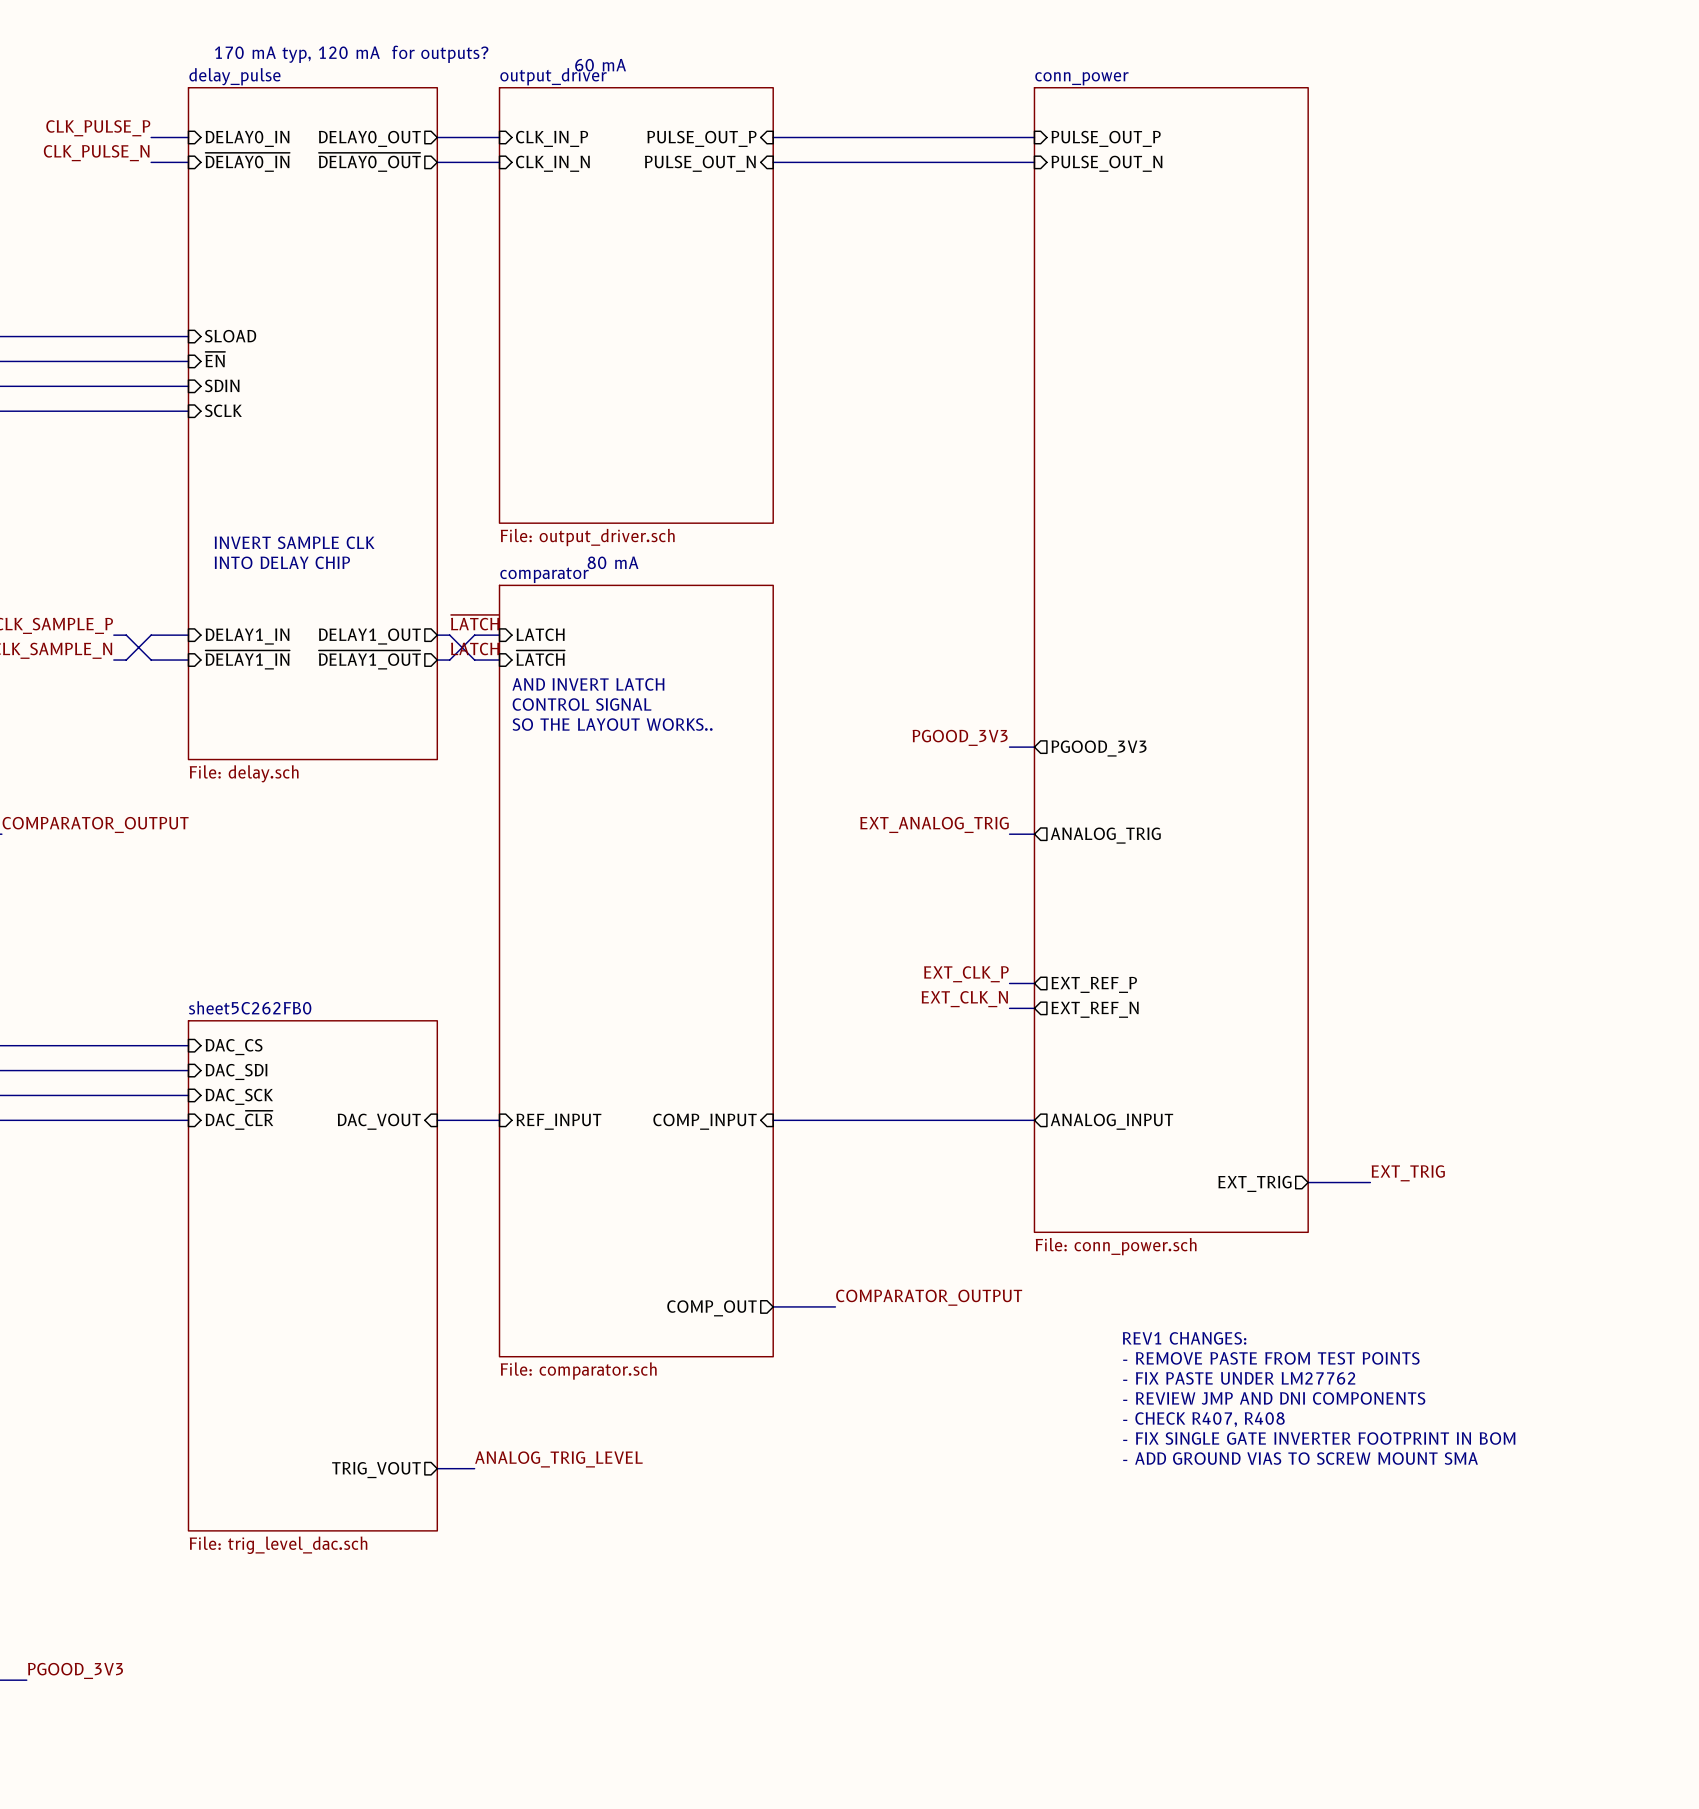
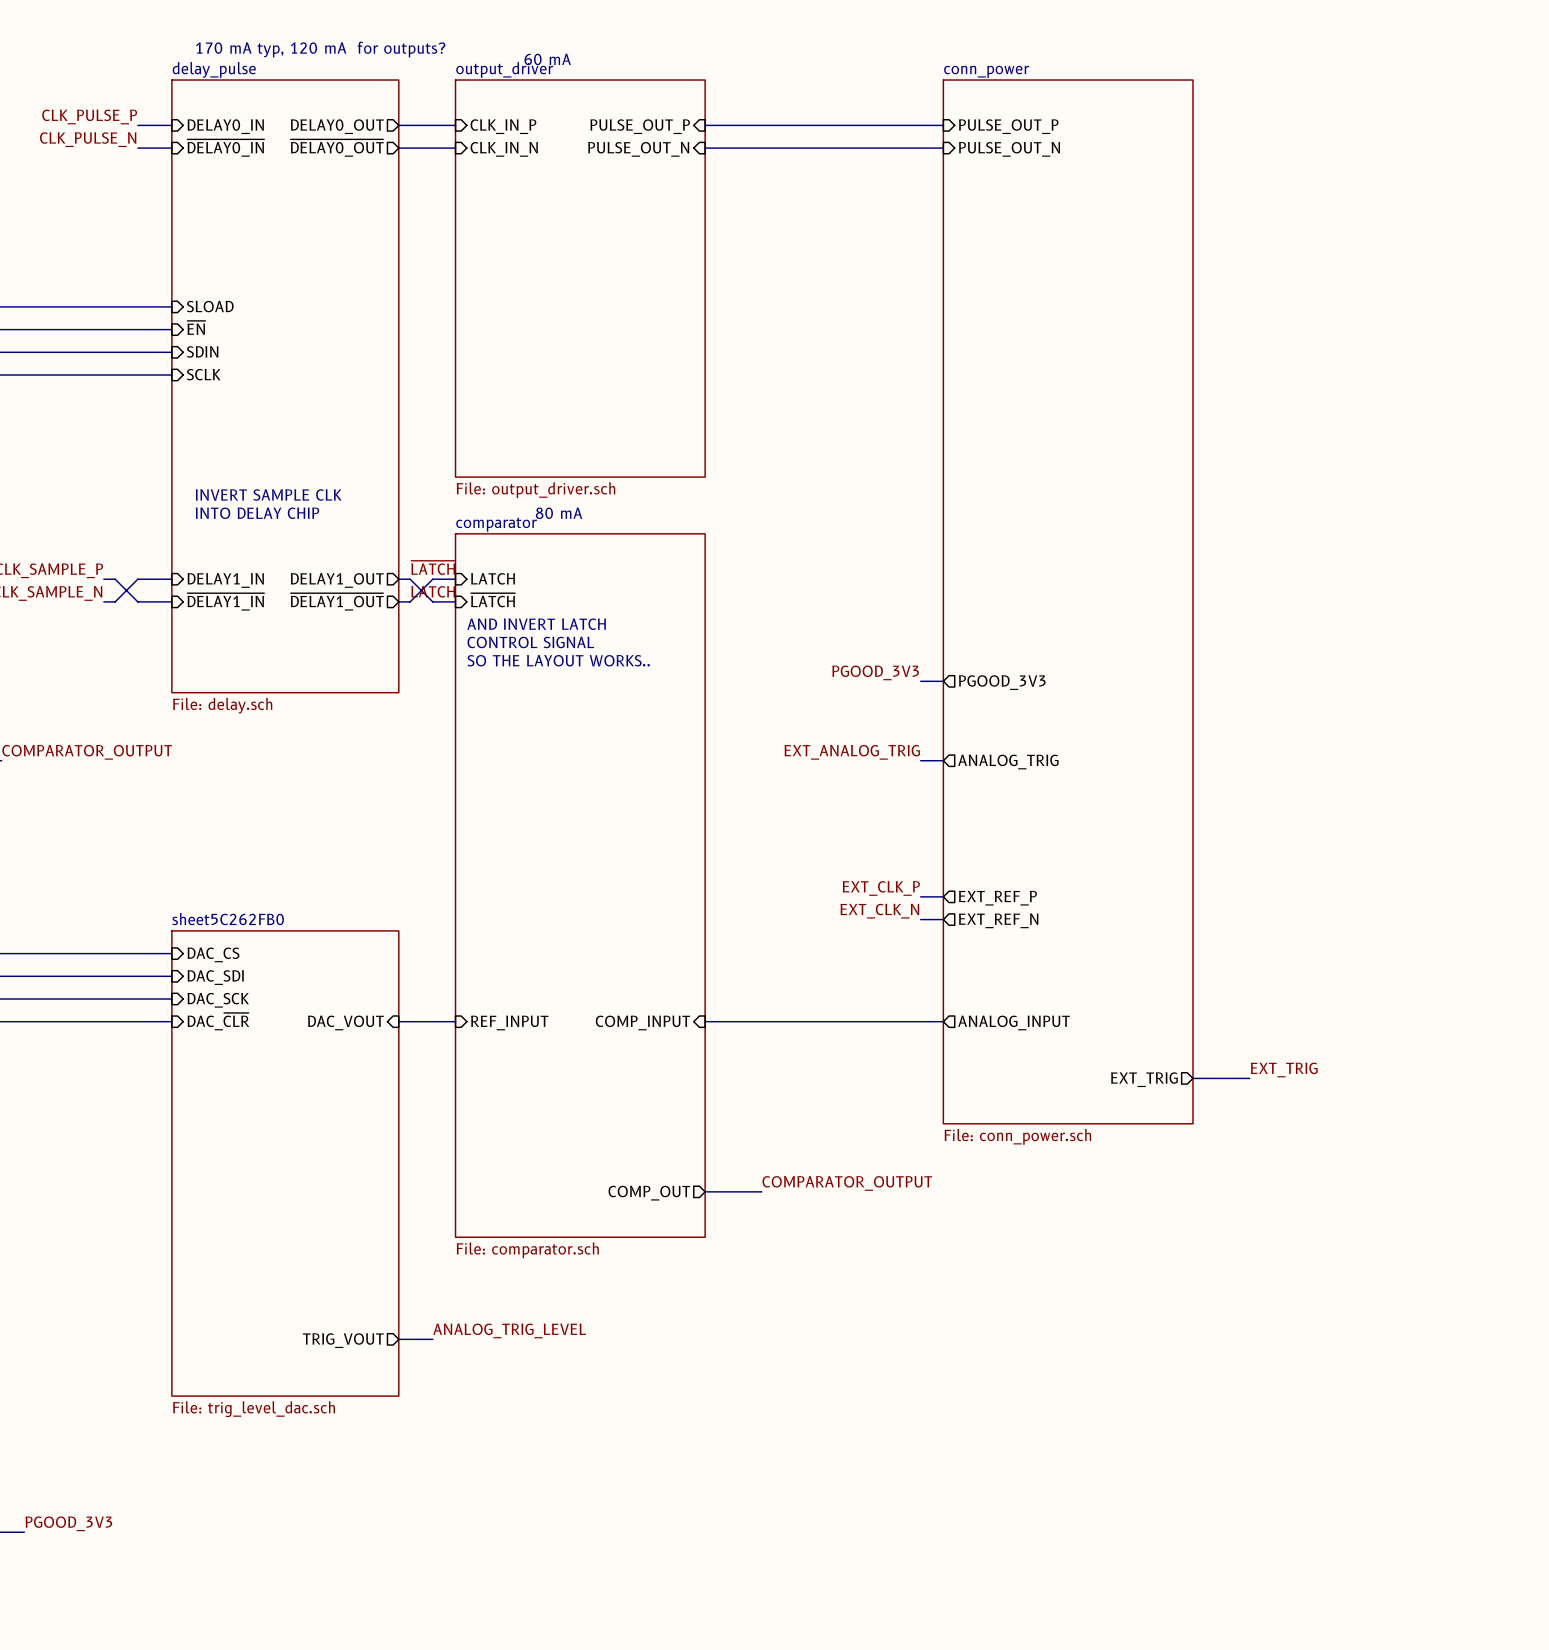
text: REV1 CHANGES: (1184, 1338) -> none
text: - REMOVE PASTE FROM TEST POINTS (1271, 1358) -> none
text: - FIX PASTE UNDER LM27762 (1239, 1378) -> none
text: - REVIEW JMP AND DNI COMPONENTS (1274, 1398) -> none
text: - CHECK R407, R408 (1203, 1419) -> none
text: - FIX SINGLE GATE INVERTER FOOTPRINT IN BOM (1319, 1438) -> none
text: - ADD GROUND VIAS TO SCREW MOUNT SMA (1300, 1458) -> none

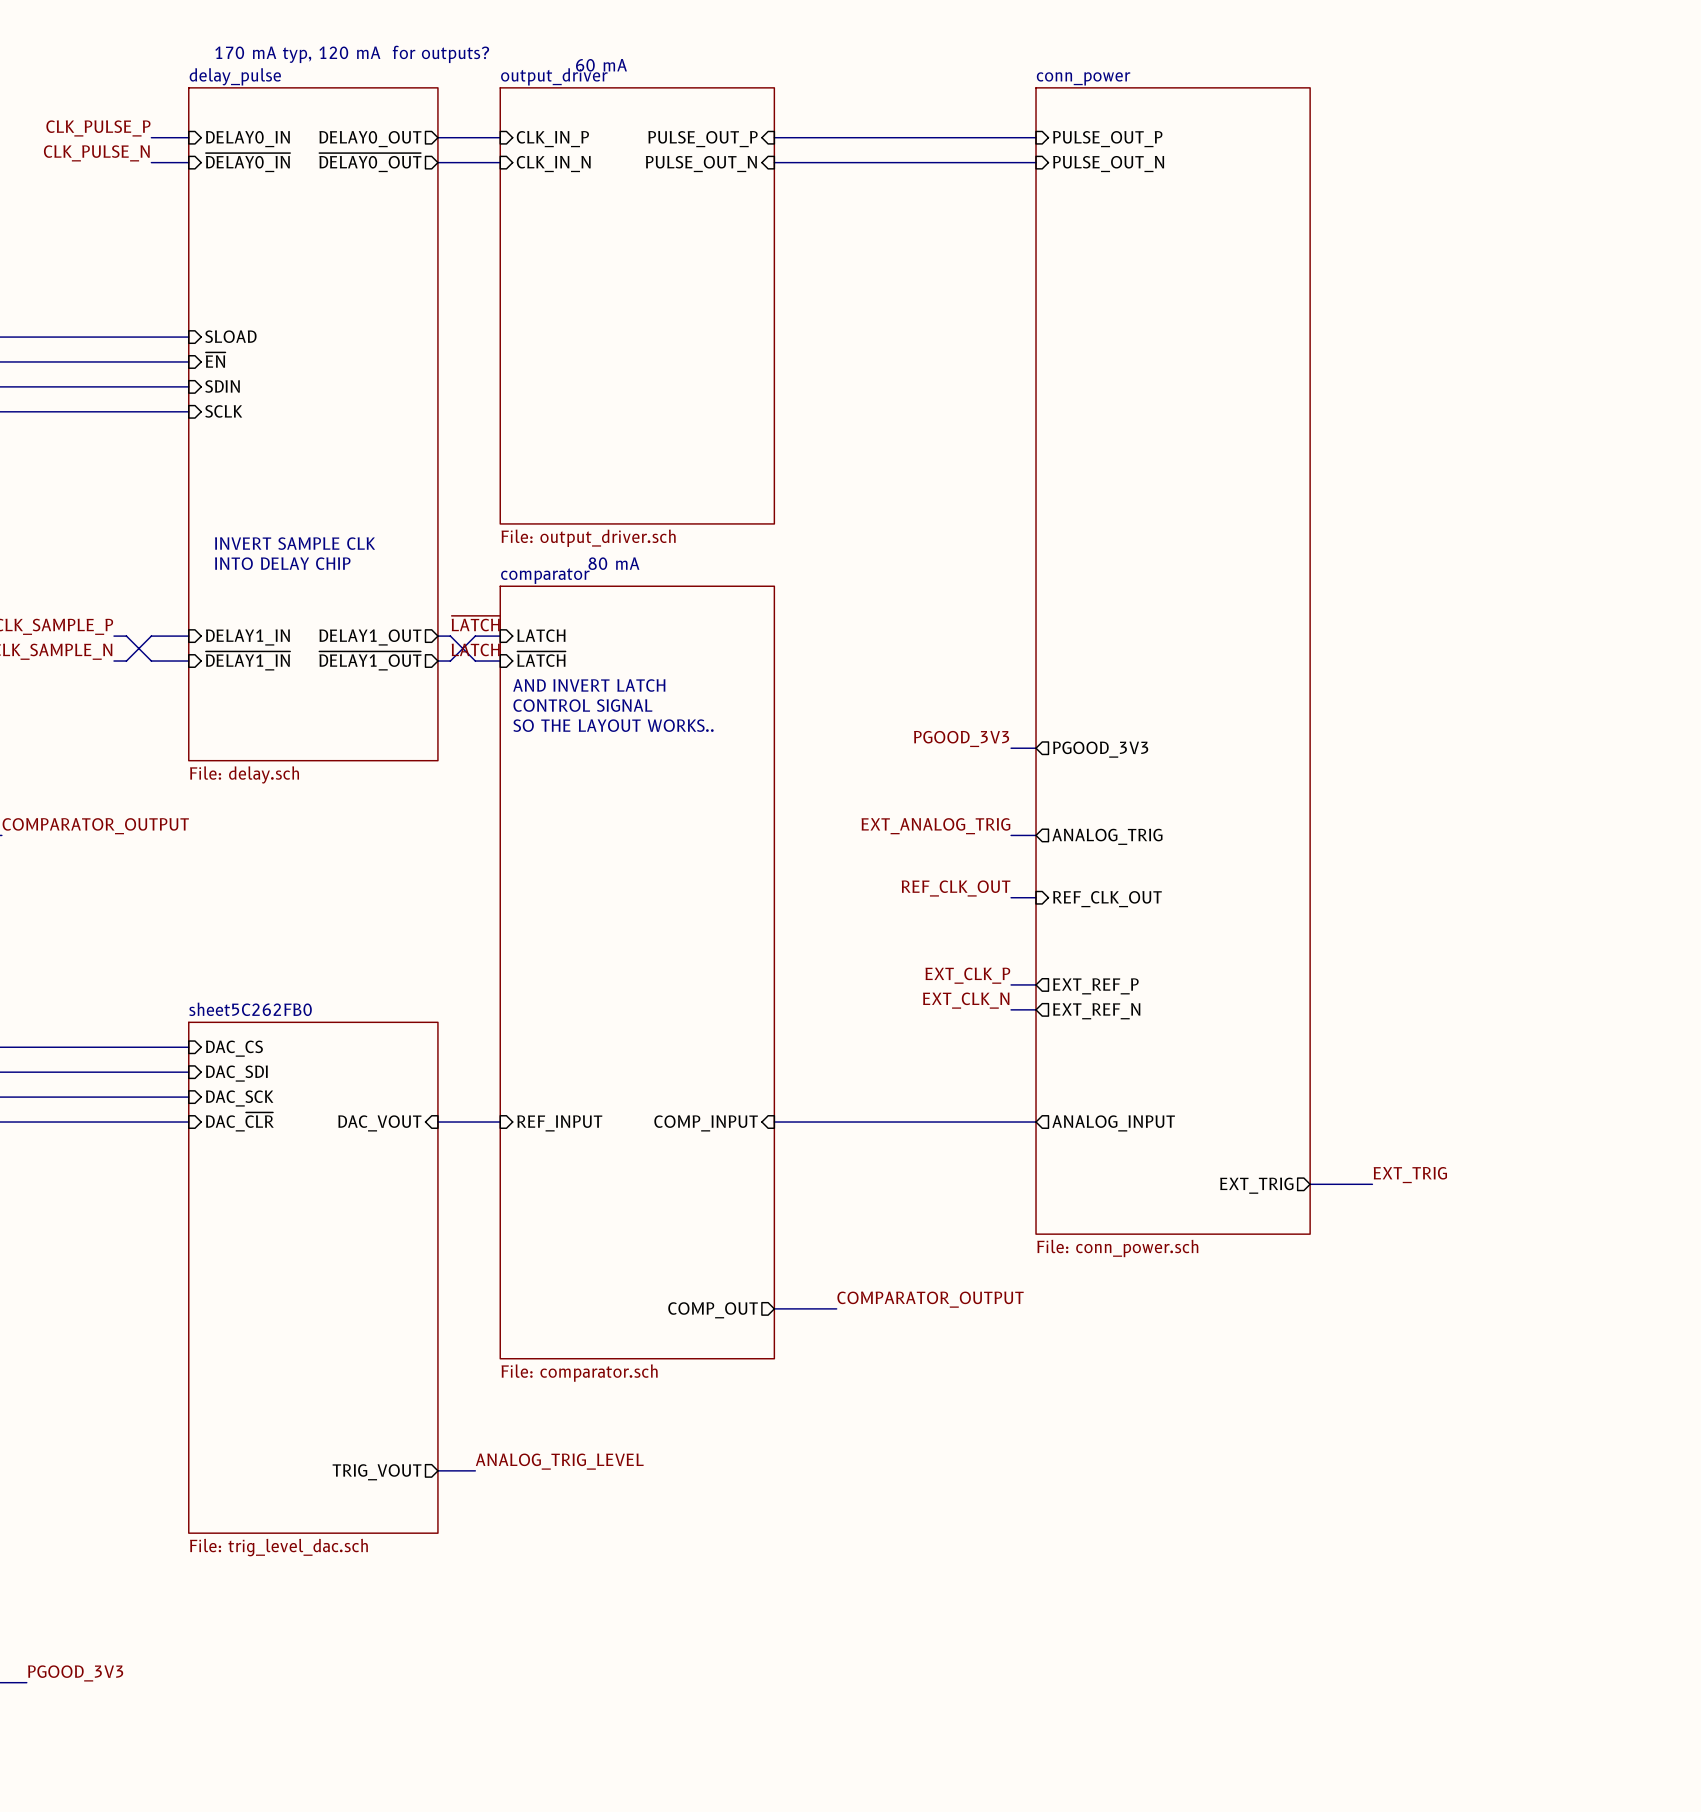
label: none -> REF_CLK_OUT (956, 888)
wire: none -> (1011, 897) (1036, 897)
sheet pin: none -> REF_CLK_OUT (1107, 899)

